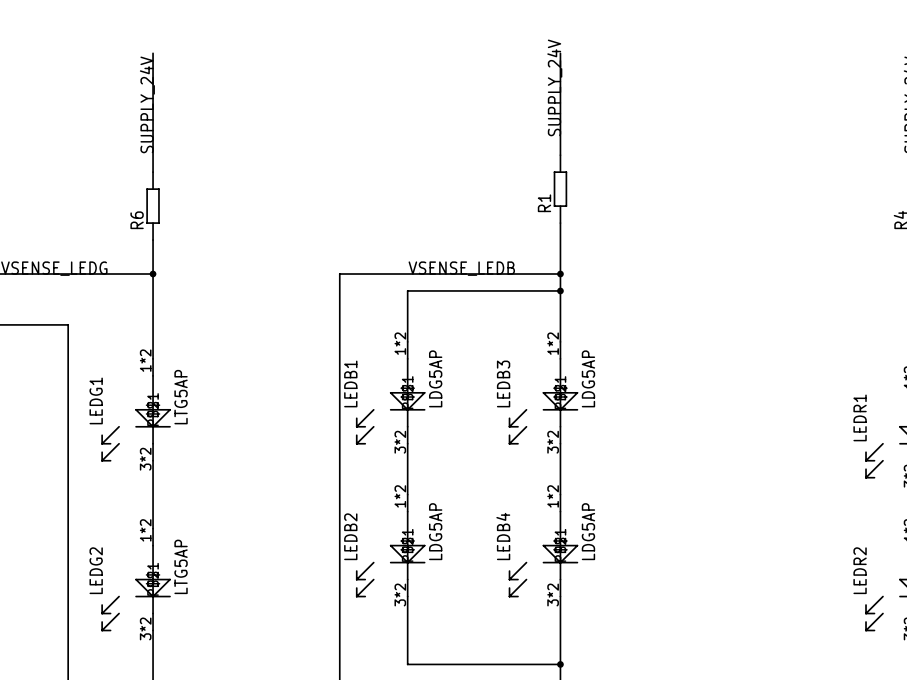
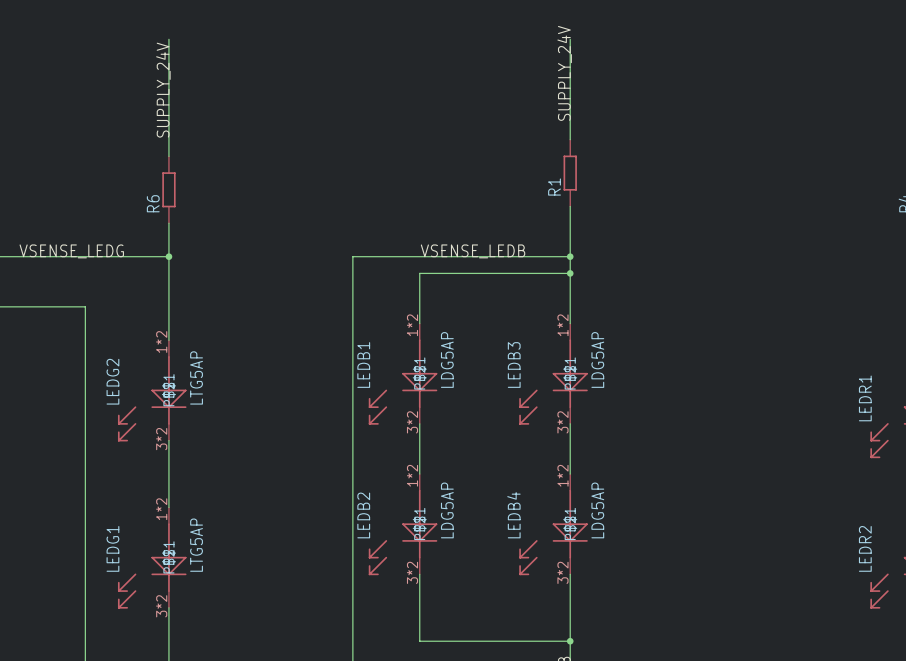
LEDG1 name: LEDG1 (96, 400) -> LEDG2 (112, 381)
LEDG2 name: LEDG2 (96, 570) -> LEDG1 (112, 548)

